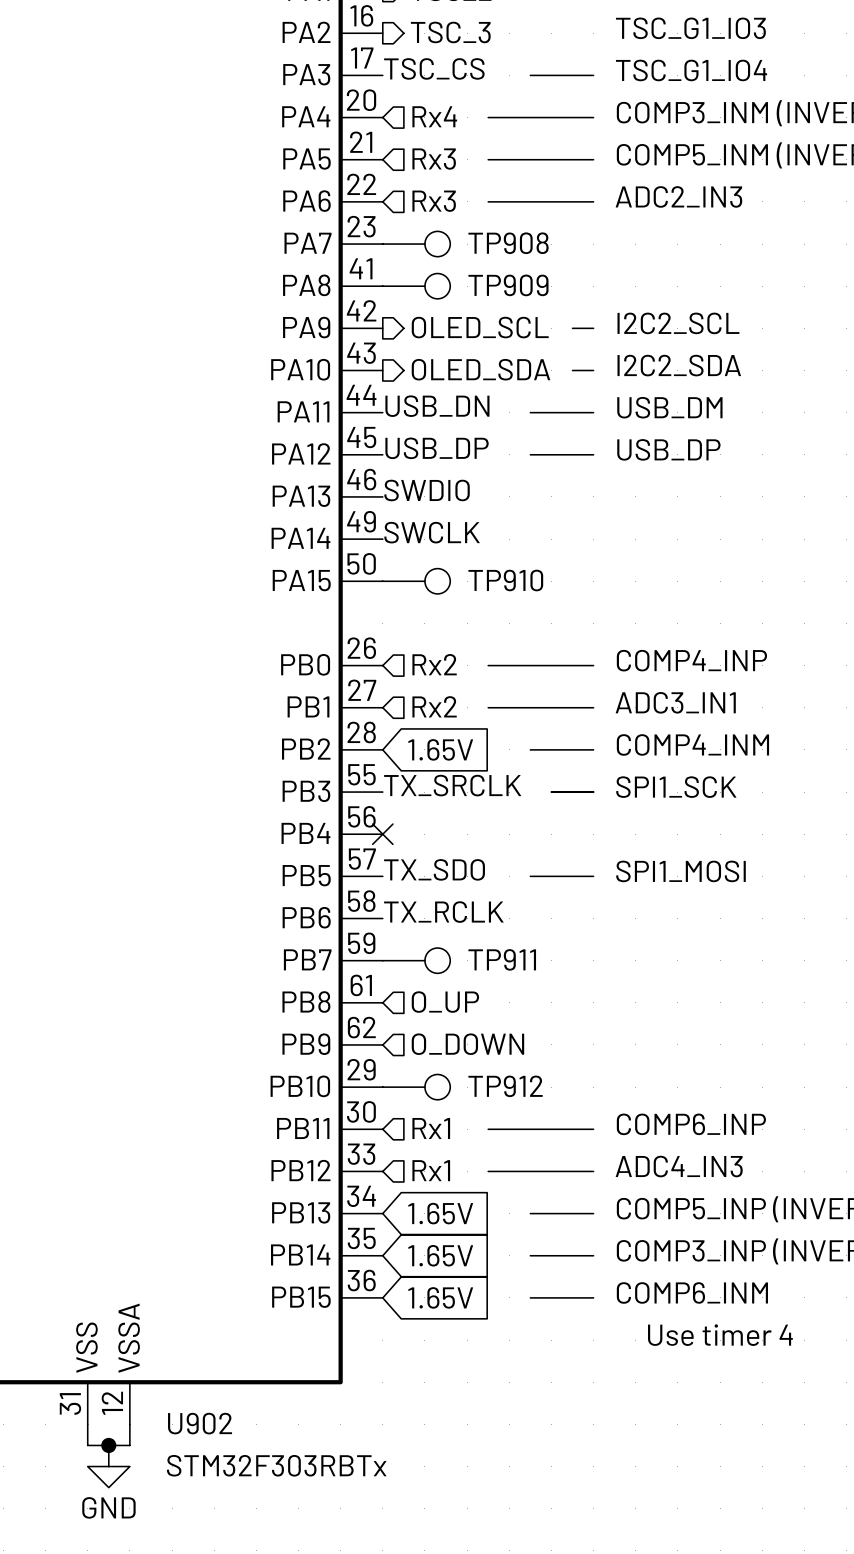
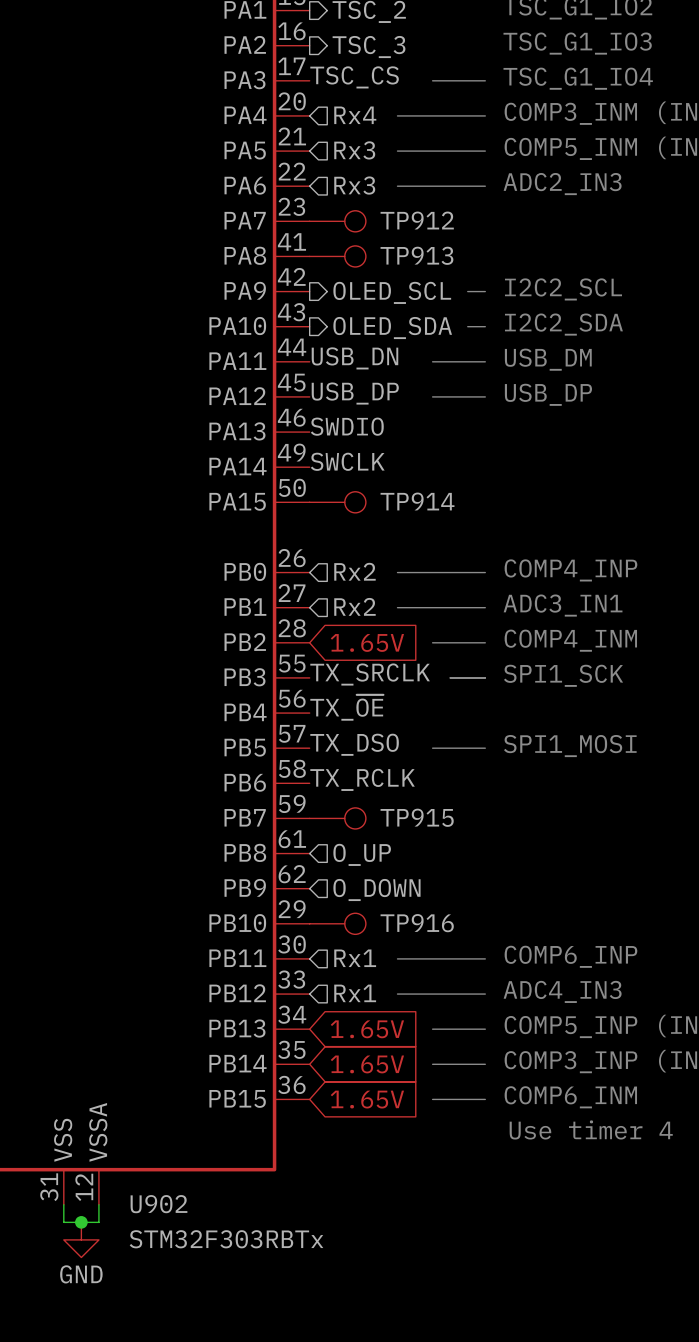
TP908 name: TP908 (508, 243) -> TP912 (417, 220)
TP909 name: TP909 (508, 285) -> TP913 (416, 255)
TP910 name: TP910 (505, 580) -> TP914 (417, 501)
label: none -> TX_~{OE} (346, 707)
no-connect mark: (382, 834) -> none
label: TX_SDO (434, 869) -> TX_DSO (354, 744)
TP911 name: TP911 (502, 959) -> TP915 (417, 817)
TP912 name: TP912 (505, 1086) -> TP916 (417, 923)

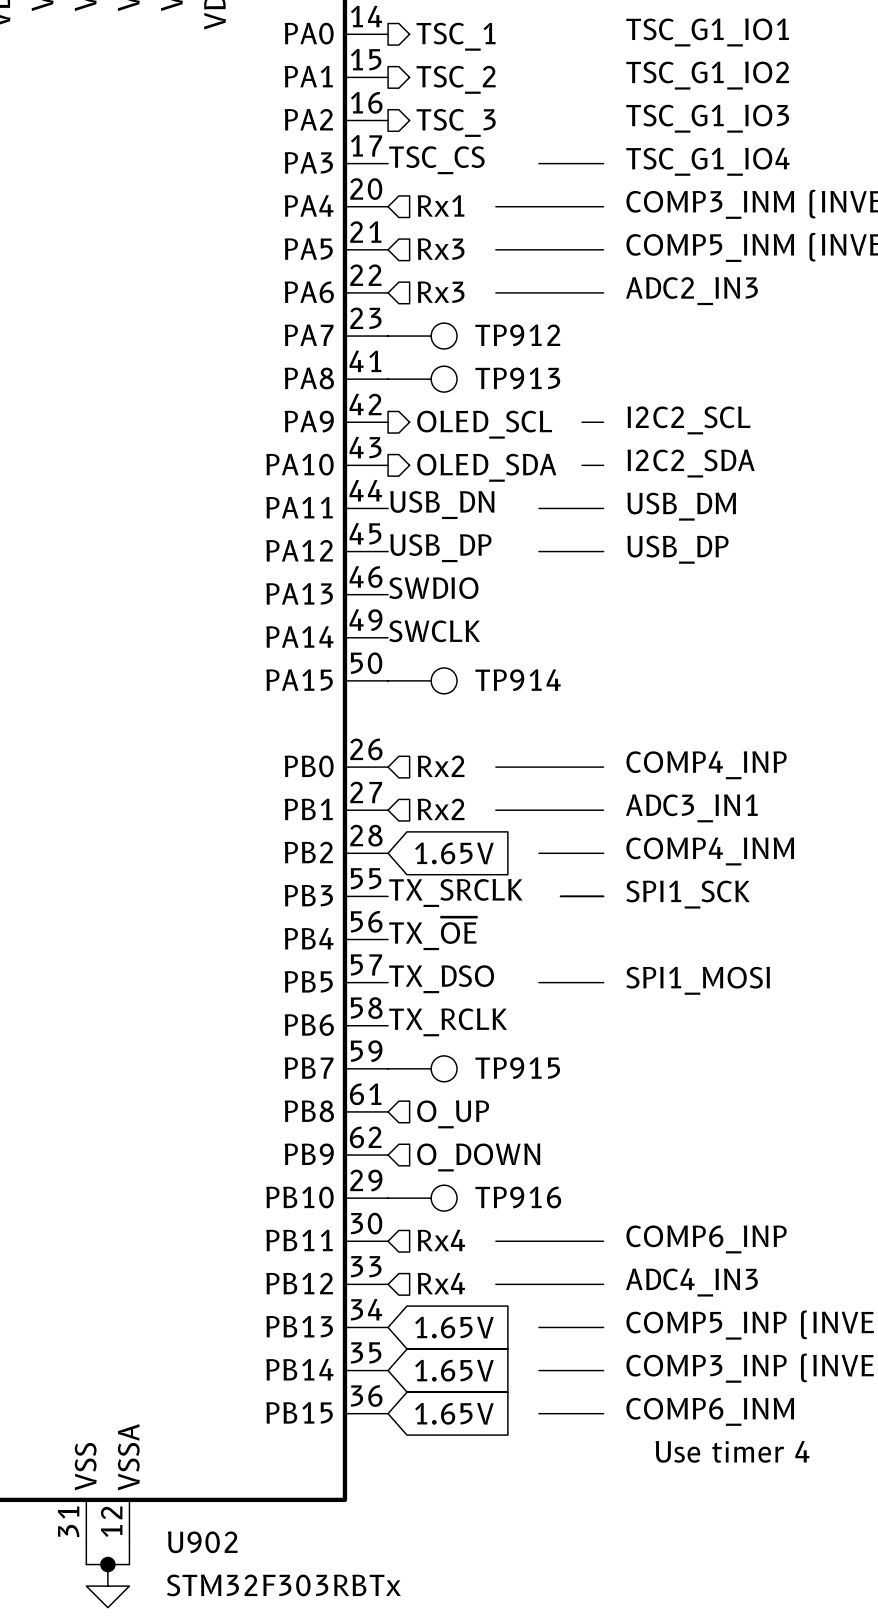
hierarchical label: Rx4 (355, 115) -> Rx1 (441, 205)
hierarchical label: Rx1 (355, 958) -> Rx4 (441, 1240)
hierarchical label: Rx1 (355, 993) -> Rx4 (441, 1283)

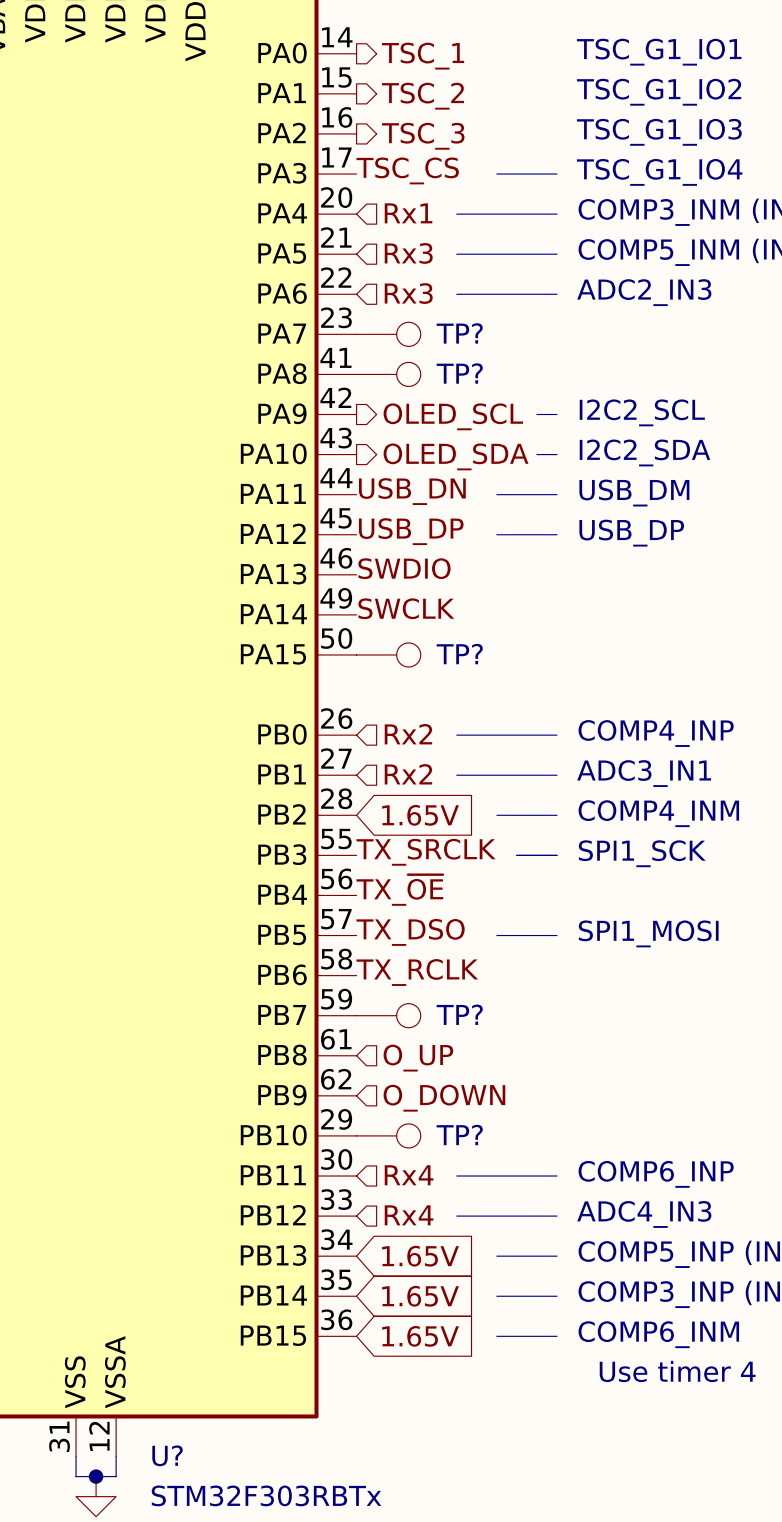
TP912 name: TP912 (517, 335) -> TP? (459, 333)
TP913 name: TP913 (517, 378) -> TP? (459, 373)
TP914 name: TP914 (518, 680) -> TP? (459, 654)
TP915 name: TP915 (517, 1068) -> TP? (459, 1014)
TP916 name: TP916 (518, 1197) -> TP? (459, 1135)
U902 name: U902 (202, 1542) -> U? (167, 1455)

